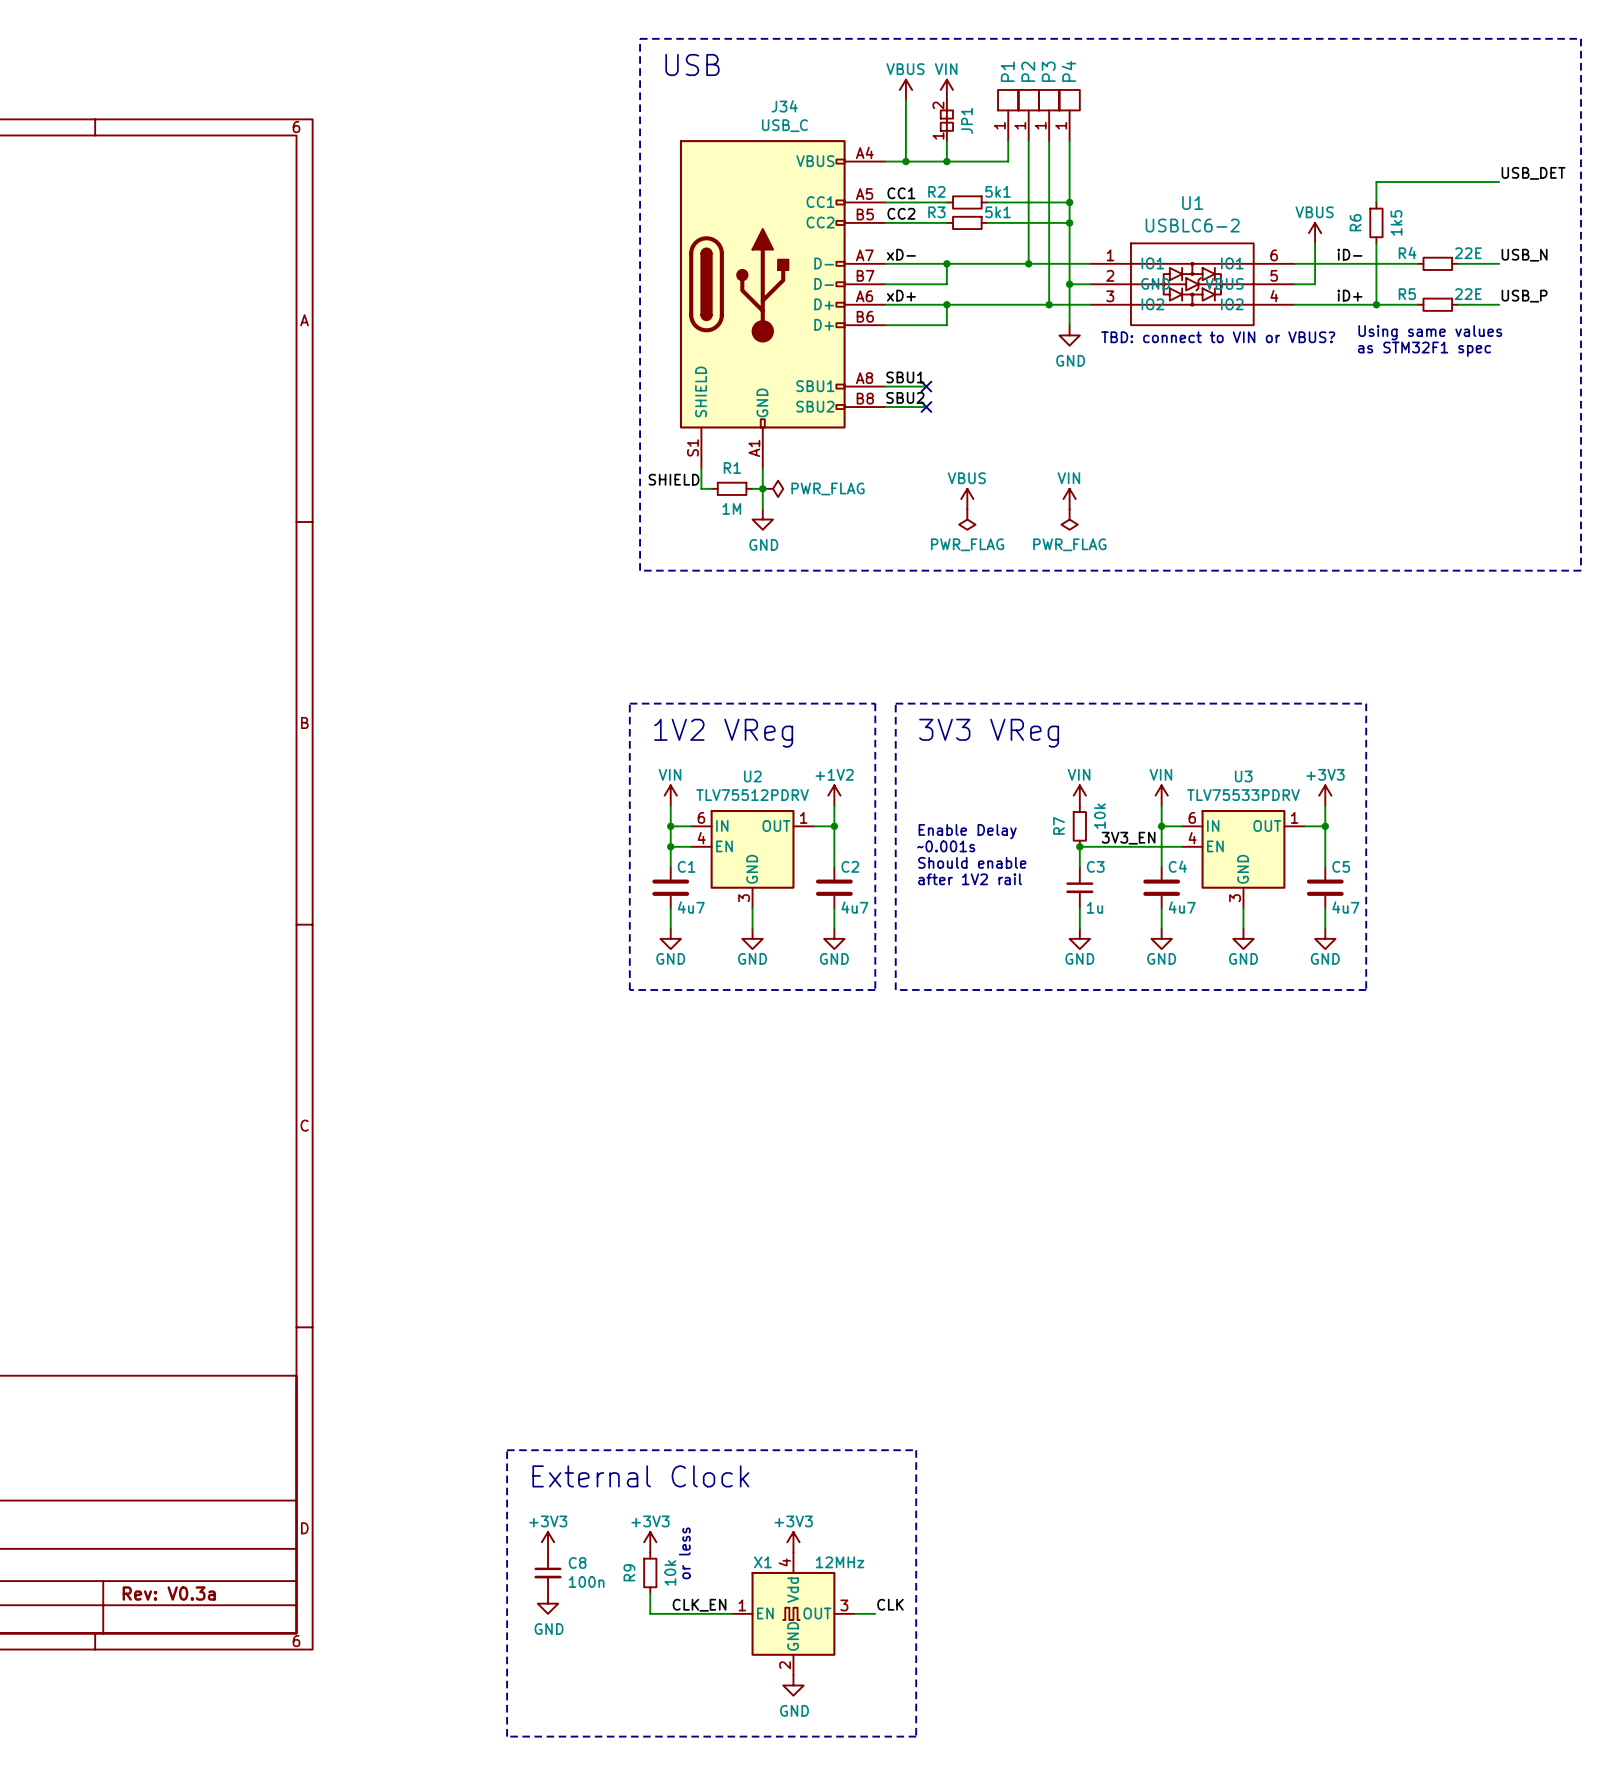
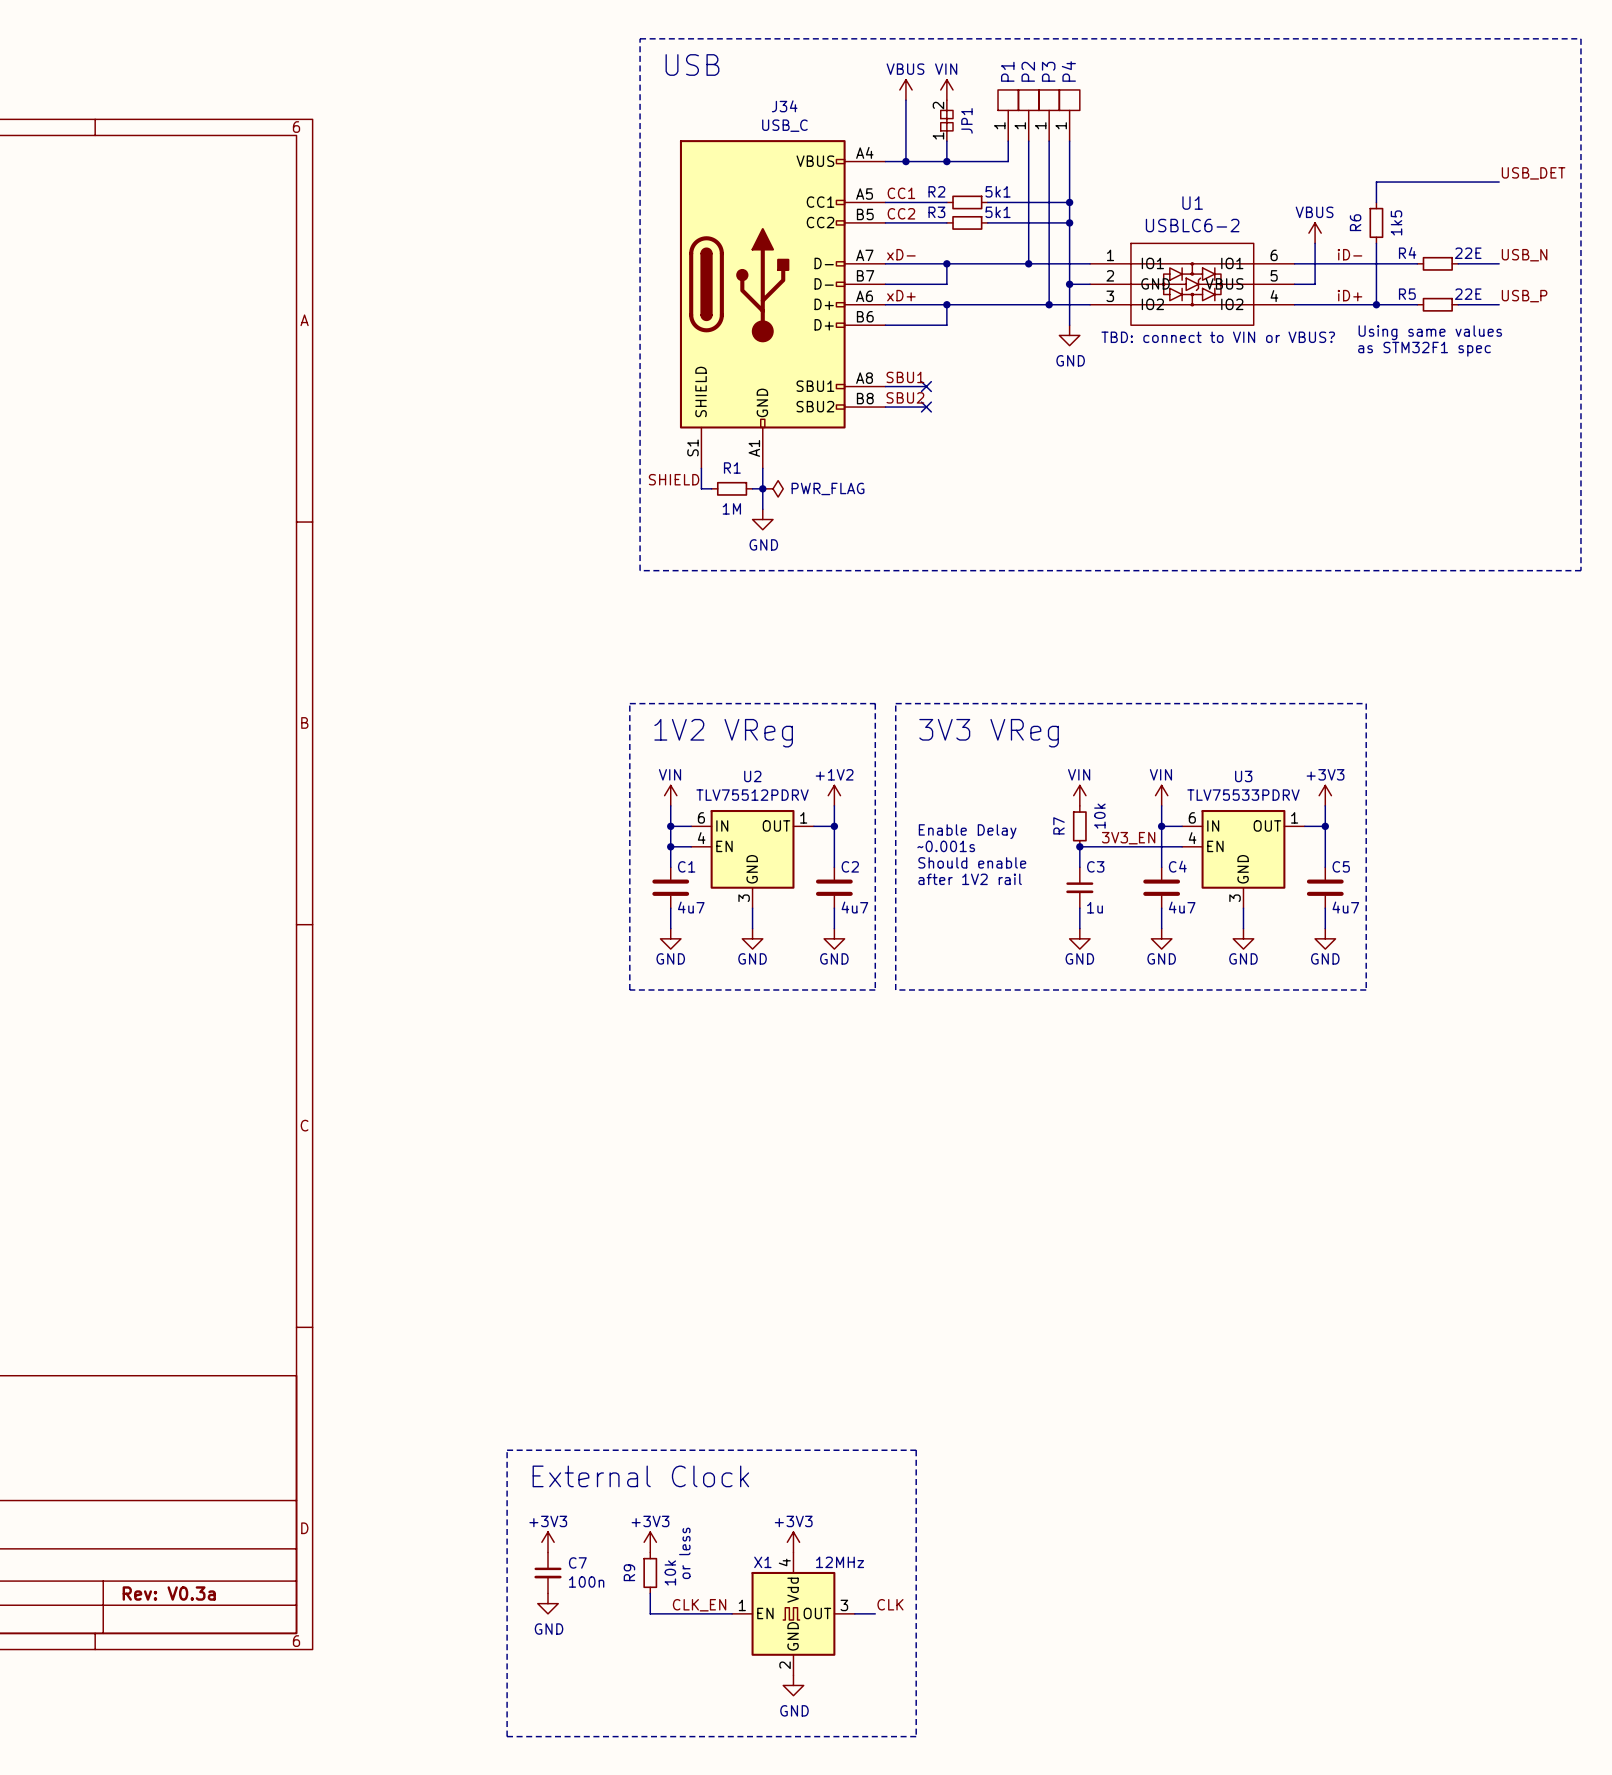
power symbol: VBUS (967, 499) -> none
power symbol: VIN (1069, 499) -> none
power symbol: PWR_FLAG (967, 519) -> none
power symbol: PWR_FLAG (1069, 519) -> none
C8 name: C8 (577, 1562) -> C7 (577, 1562)

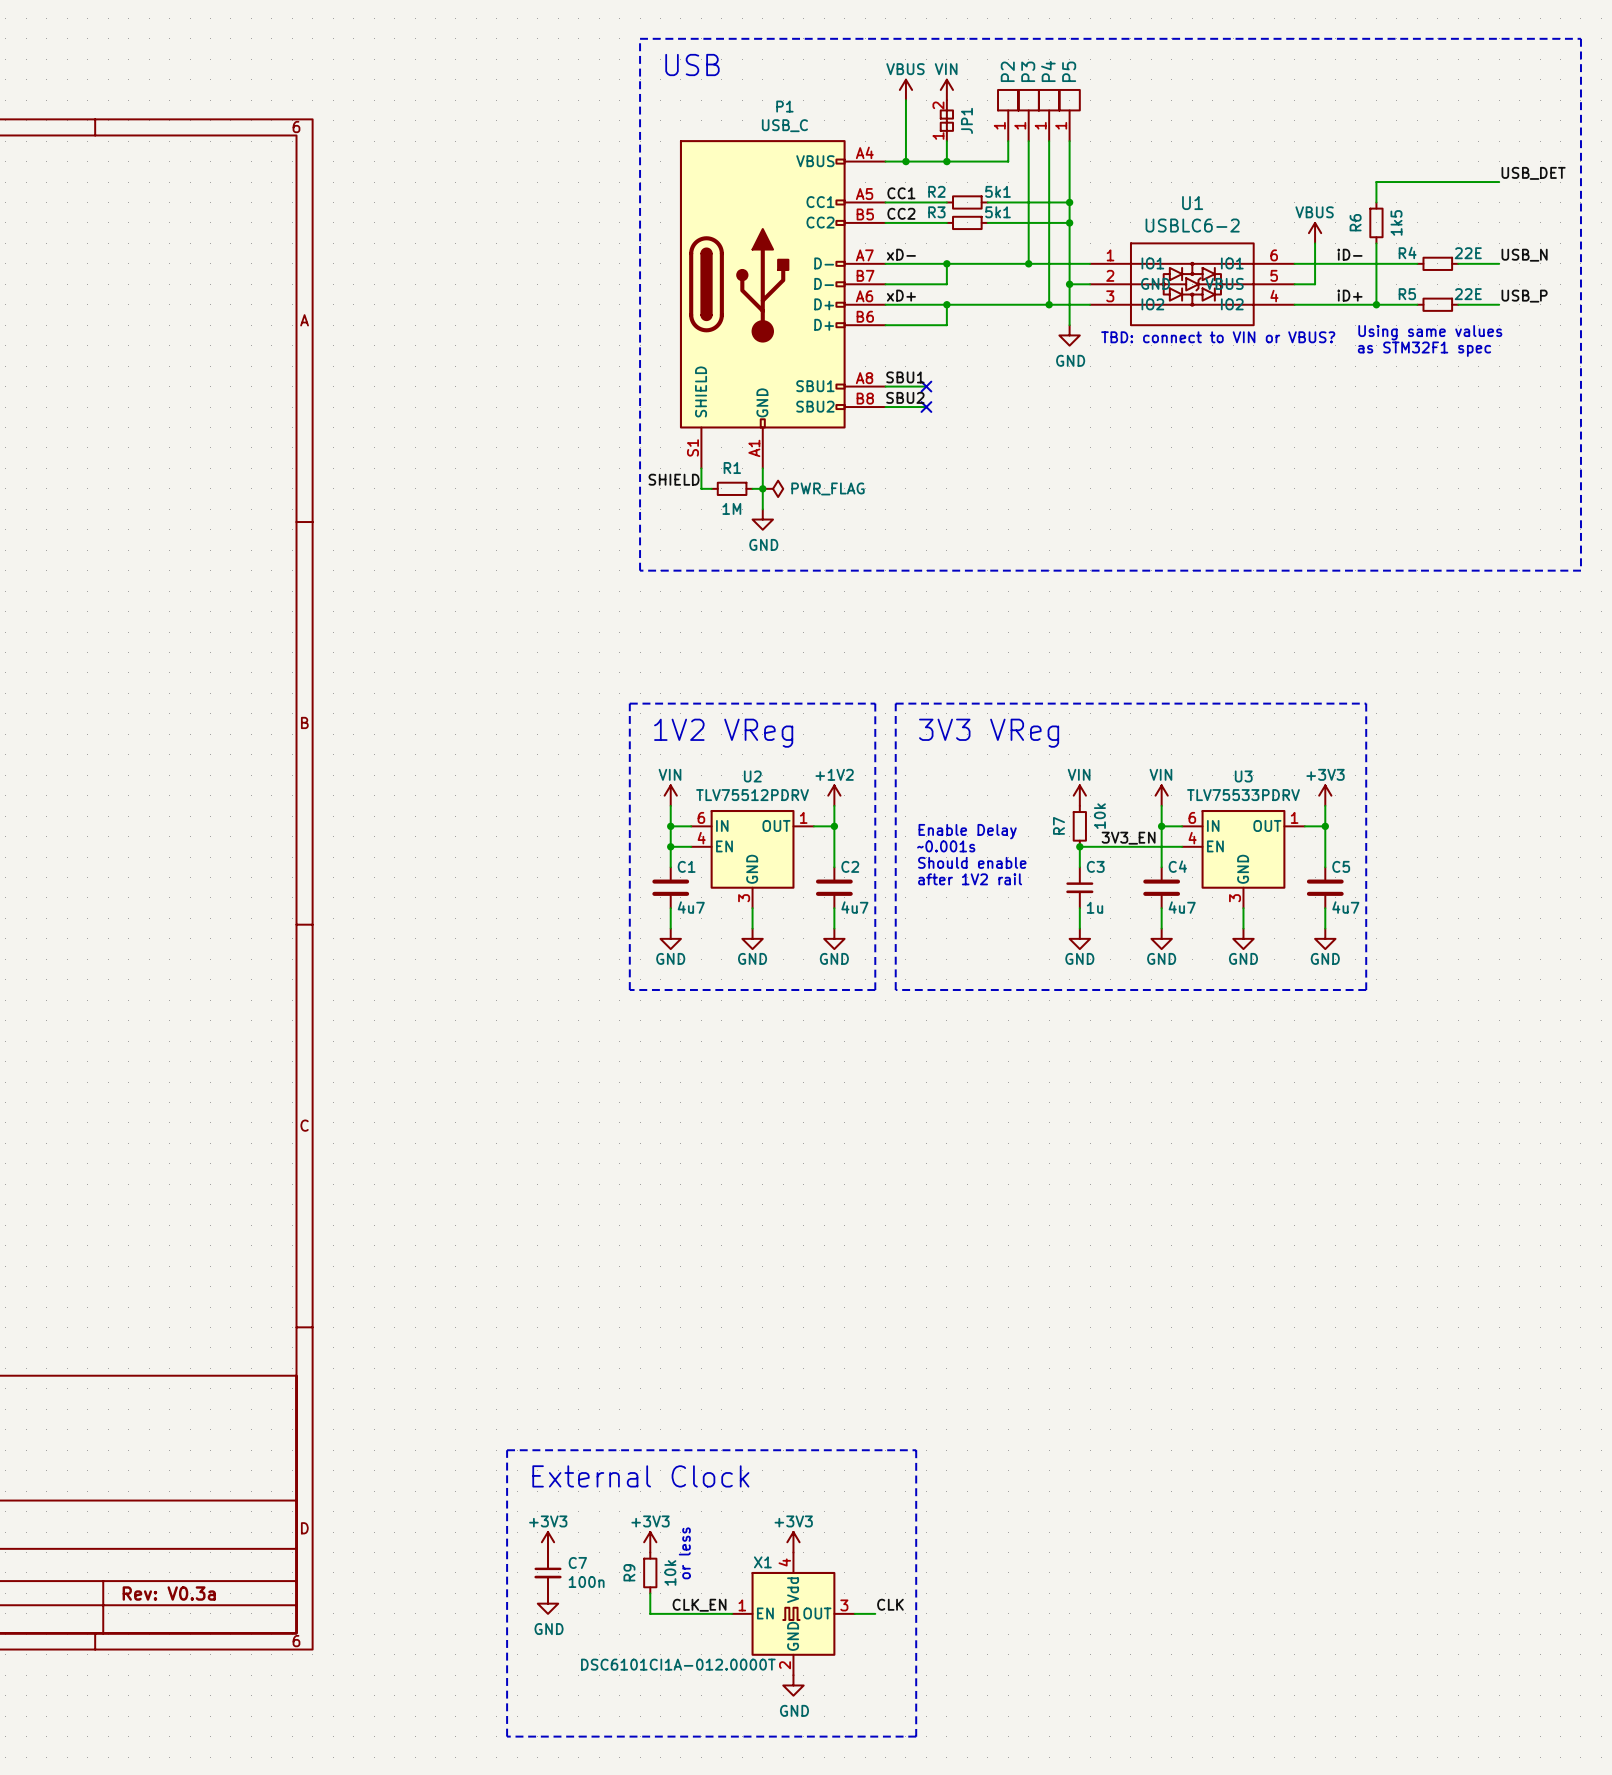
P1 name: P1 (1007, 71) -> P2 (1007, 71)
P2 name: P2 (1028, 71) -> P3 (1028, 71)
P3 name: P3 (1048, 71) -> P4 (1048, 71)
P4 name: P4 (1068, 71) -> P5 (1069, 71)
J34 name: J34 (784, 106) -> P1 (784, 106)
X1 value: 12MHz (840, 1562) -> DSC6101CI1A-012.0000T (678, 1664)

